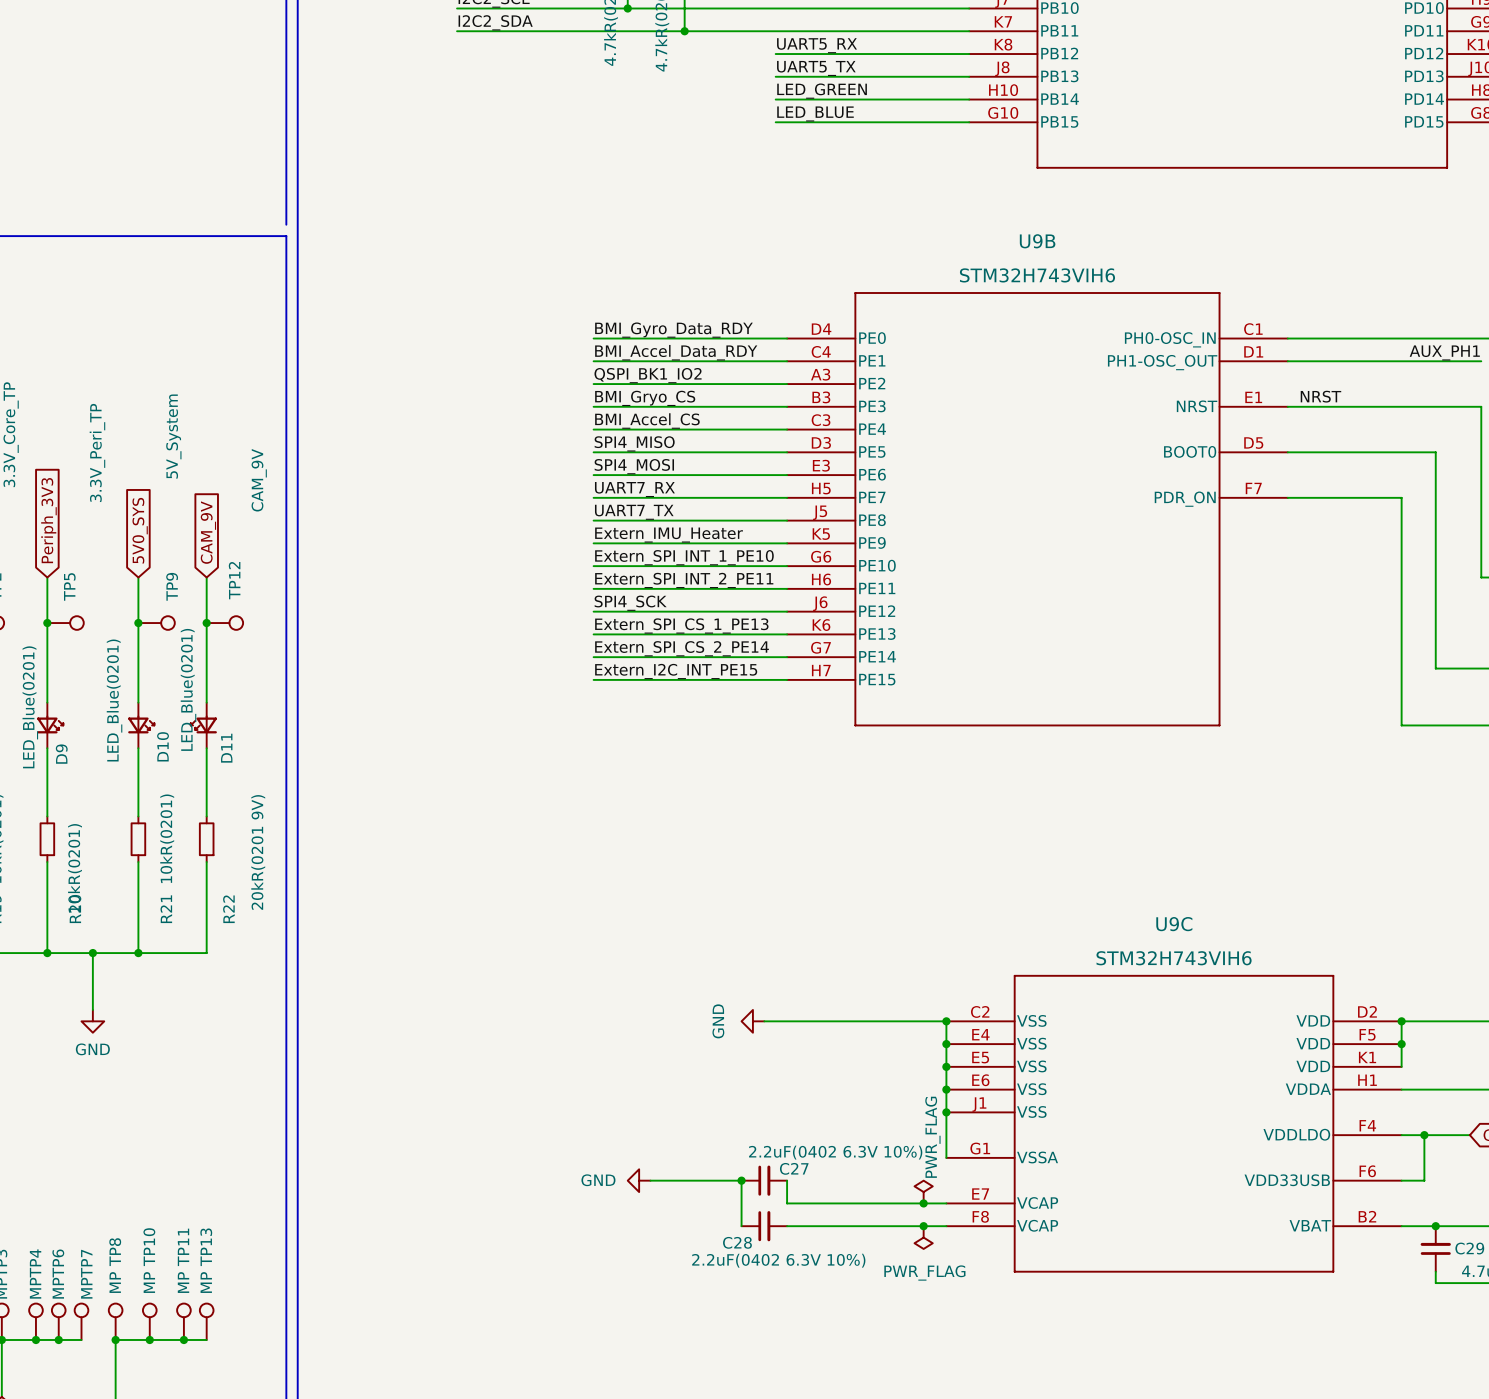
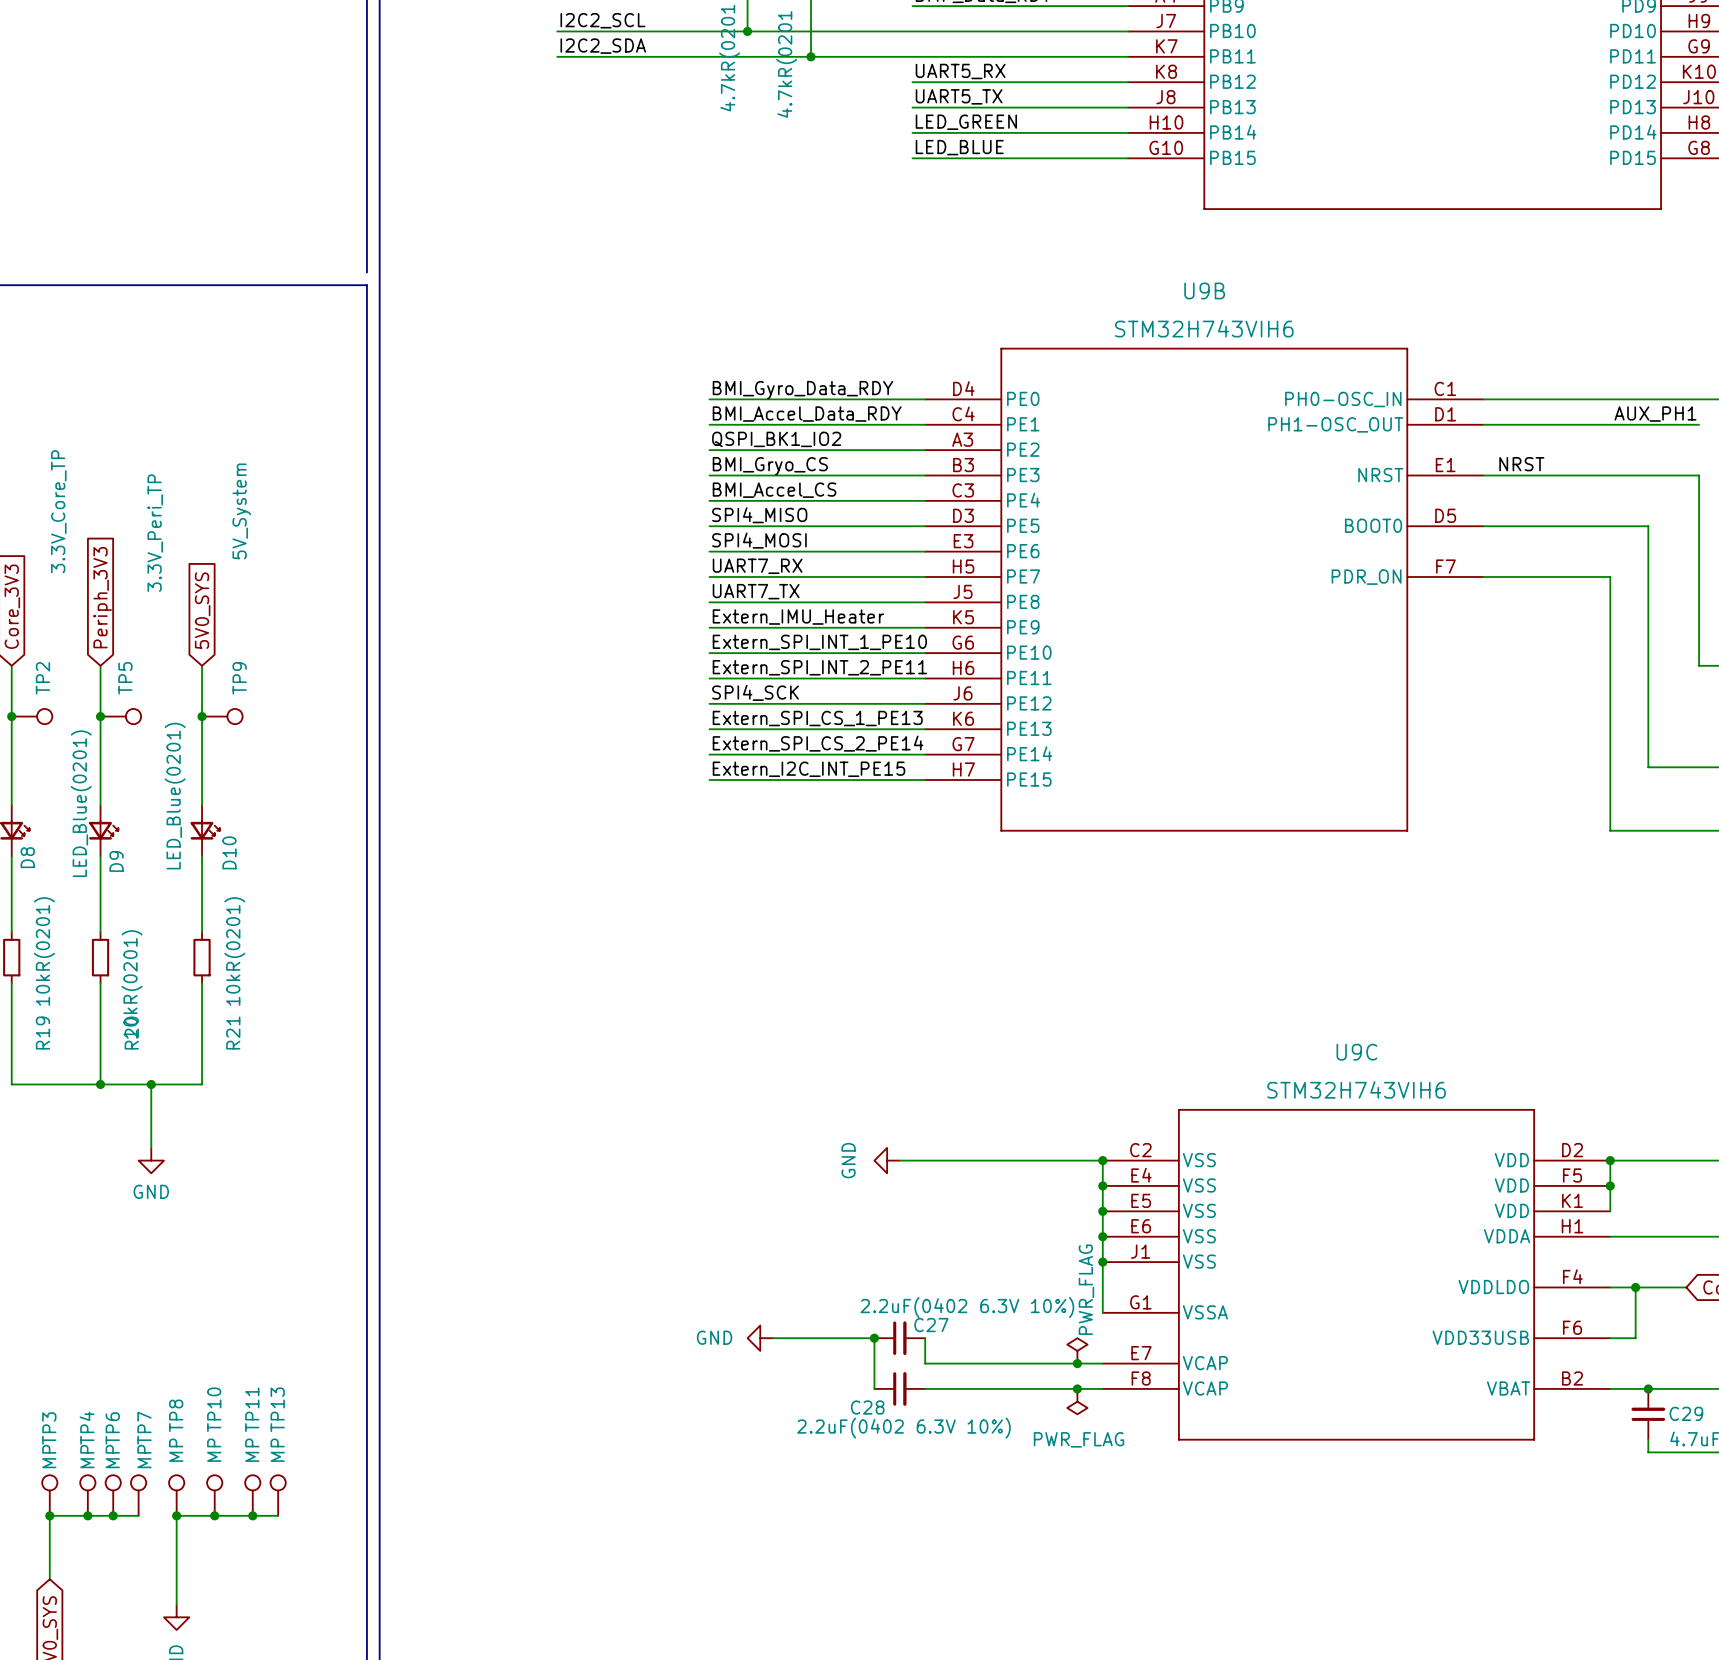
global label: CAM_9V (208, 532) -> none
wire: (206, 577) (206, 702) -> none
junction: (206, 623) -> none
TP12: CAM_9V (224, 623) -> none
D11: LED_Blue(0201) (203, 725) -> none
wire: (206, 748) (206, 816) -> none
R22: 20kR(0201 9V) (206, 839) -> none
wire: (206, 862) (206, 953) (138, 953) -> none
junction: (138, 953) -> none

